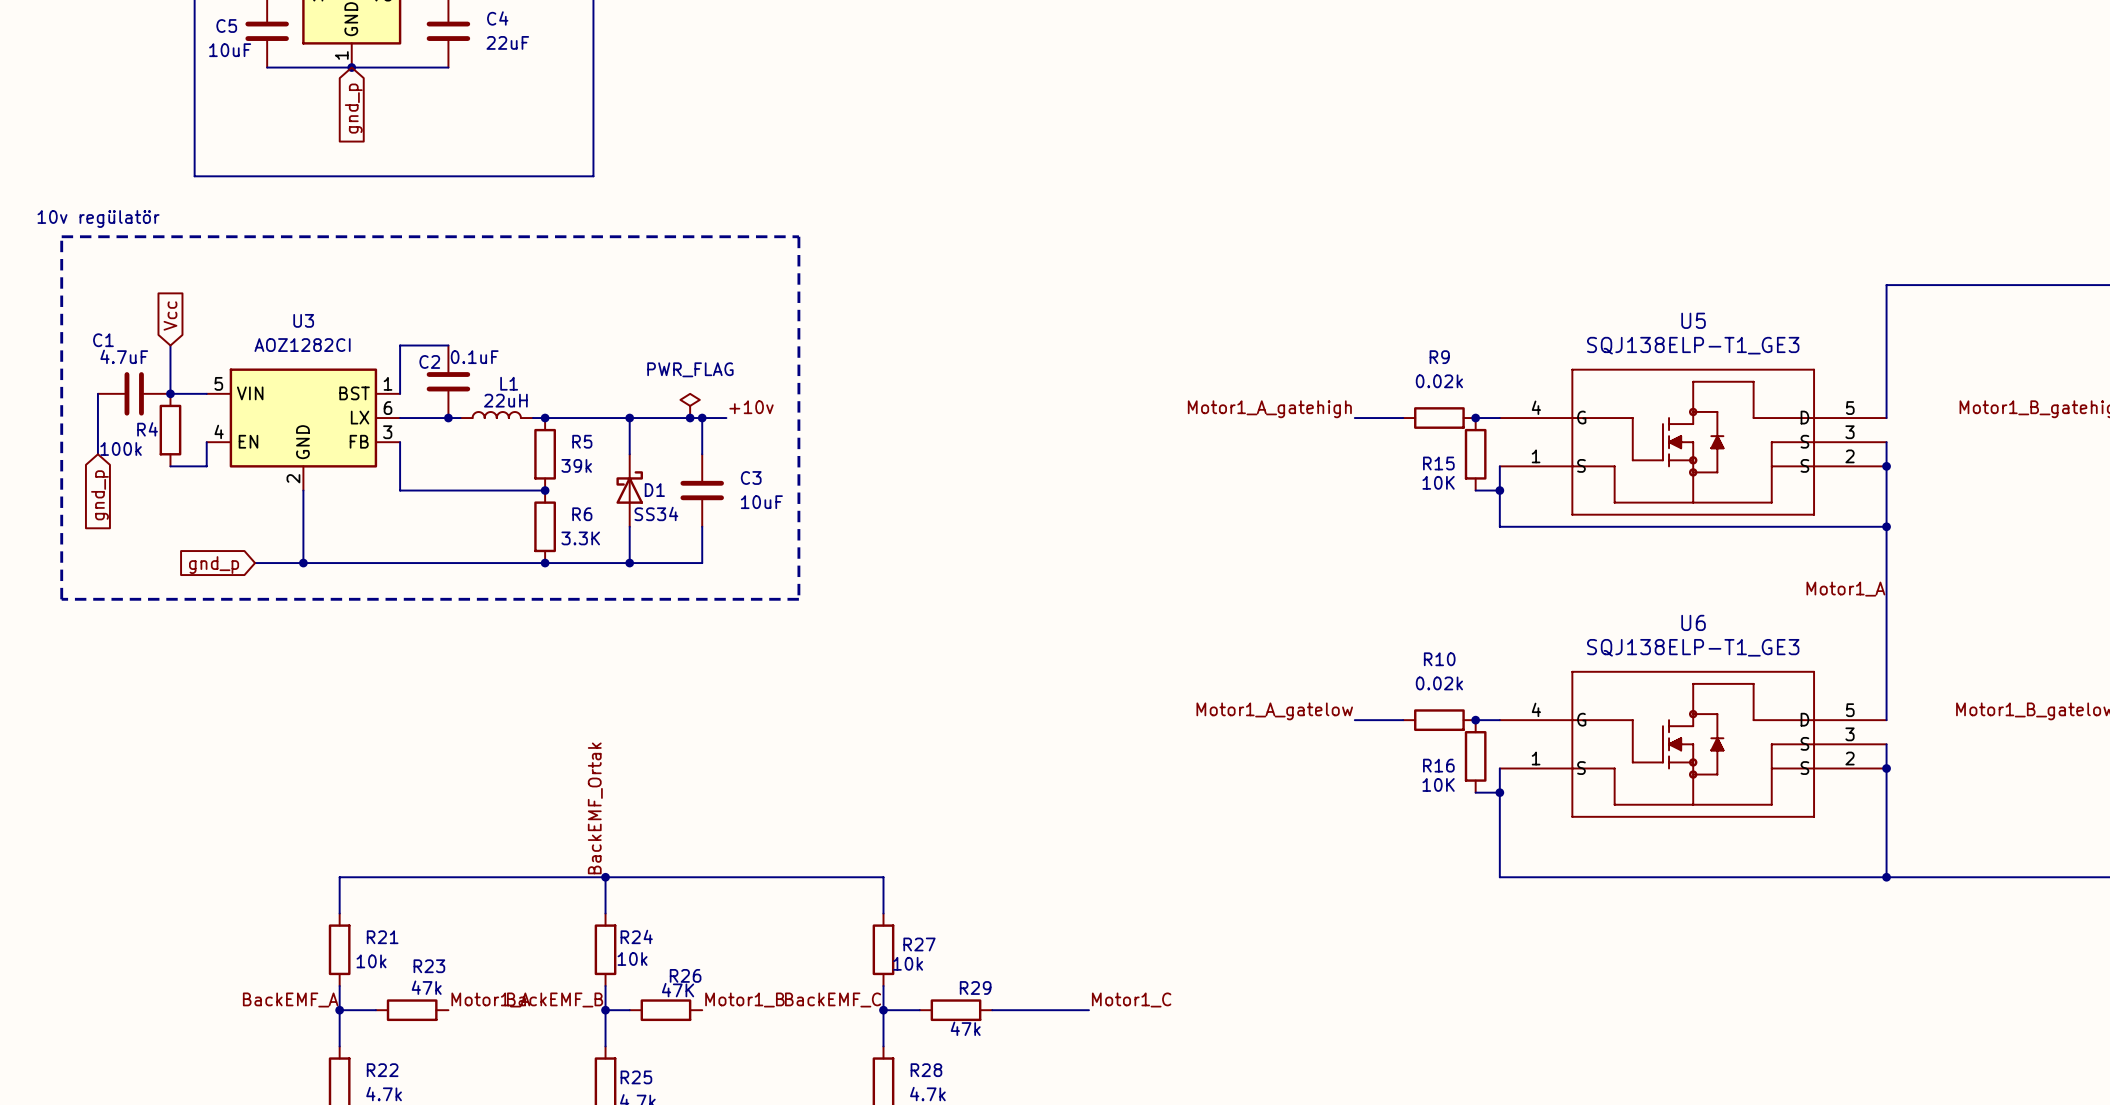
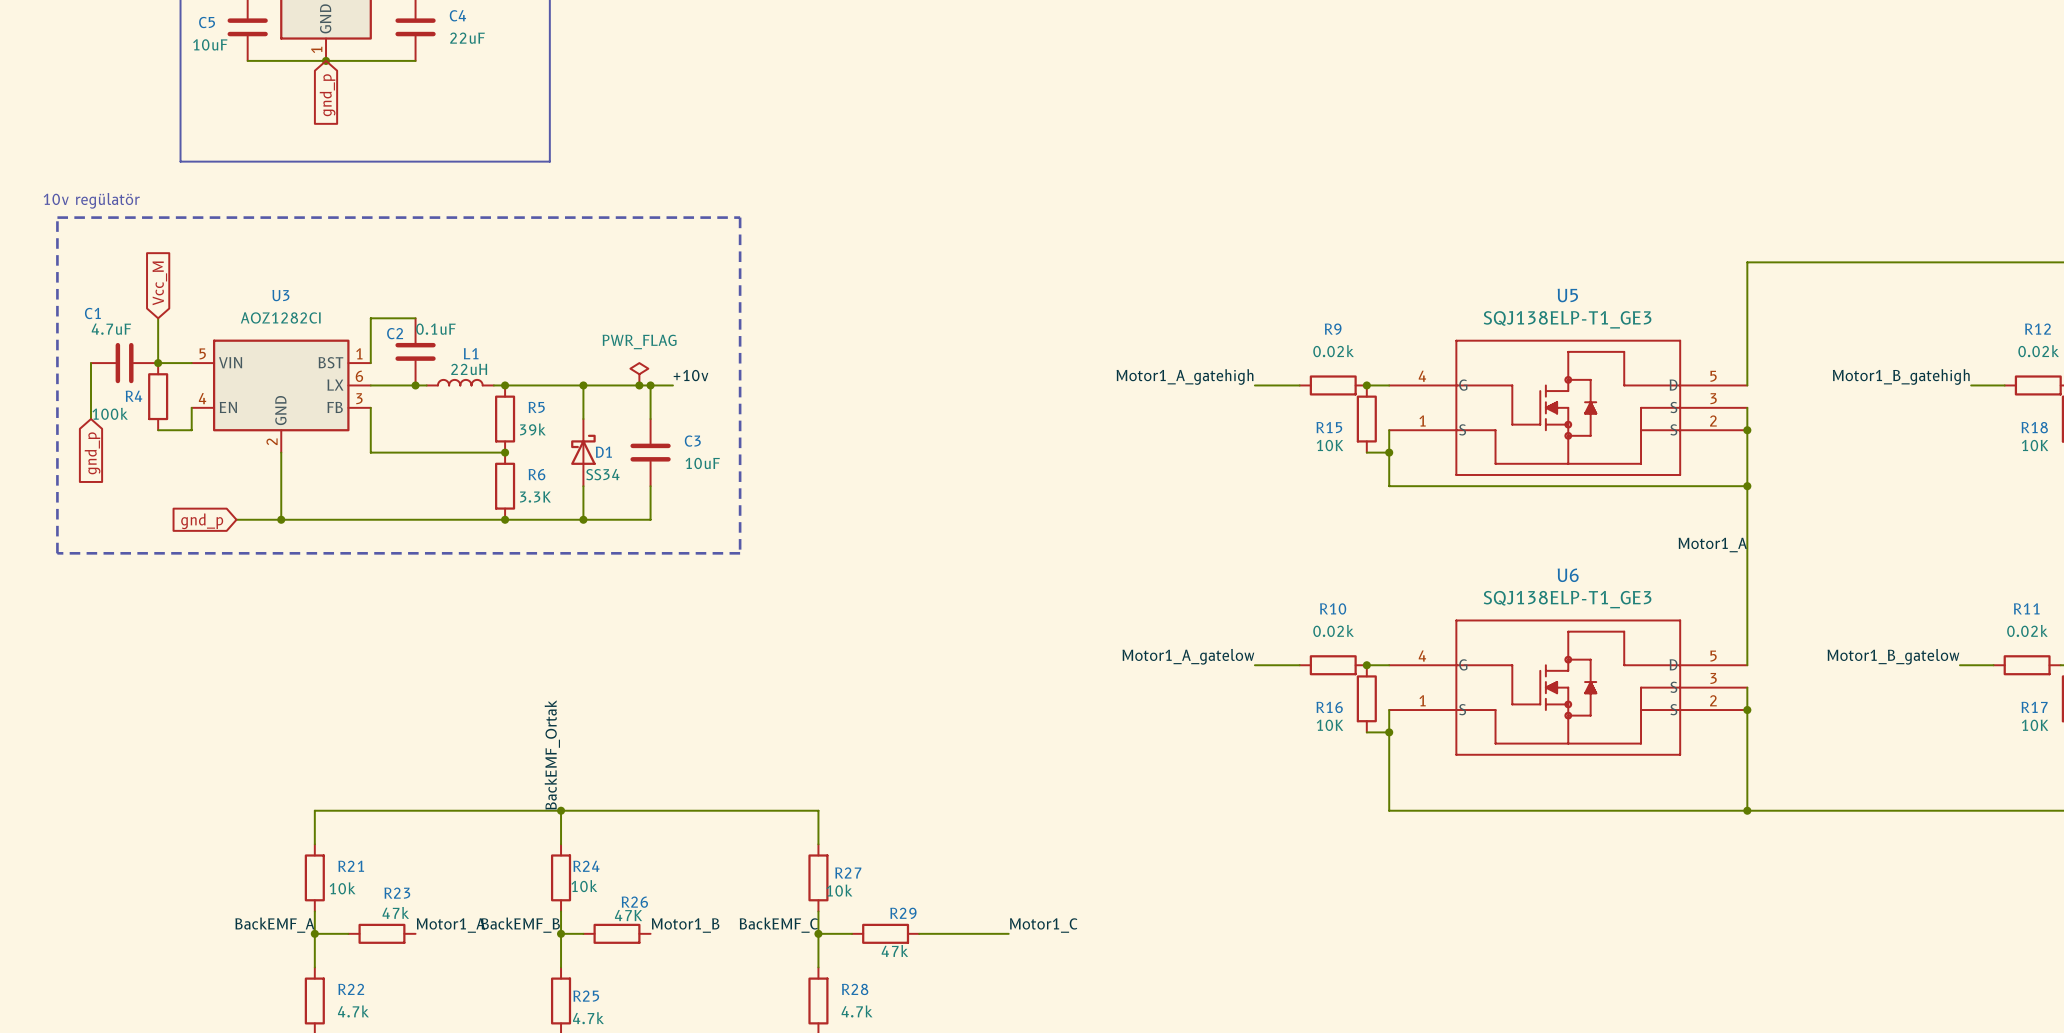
global label: Vcc (170, 316) -> Vcc_M (159, 283)

